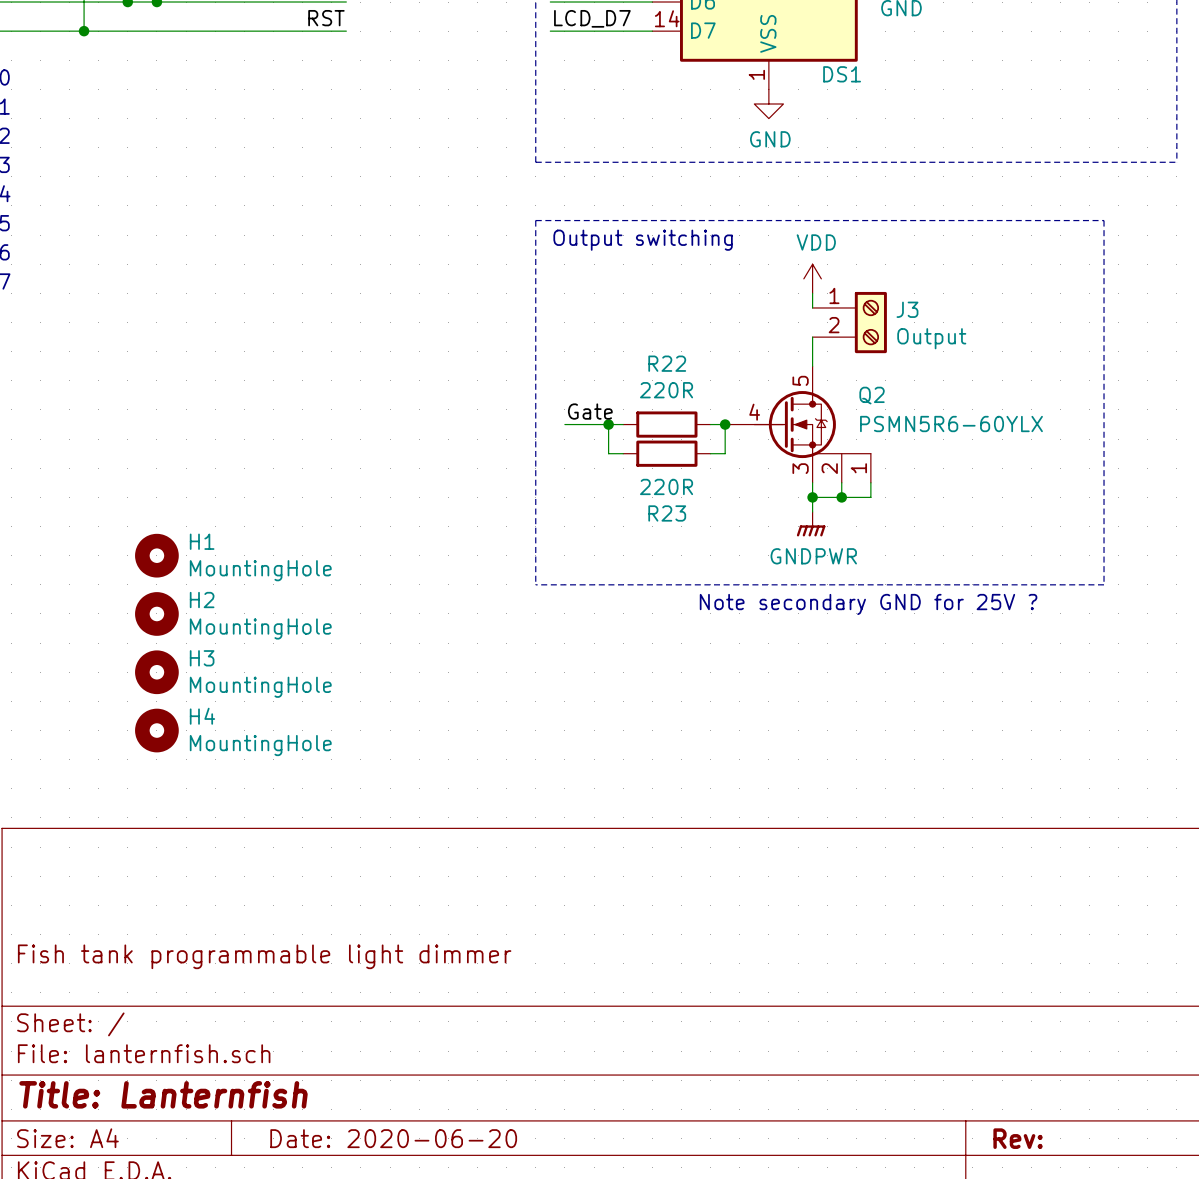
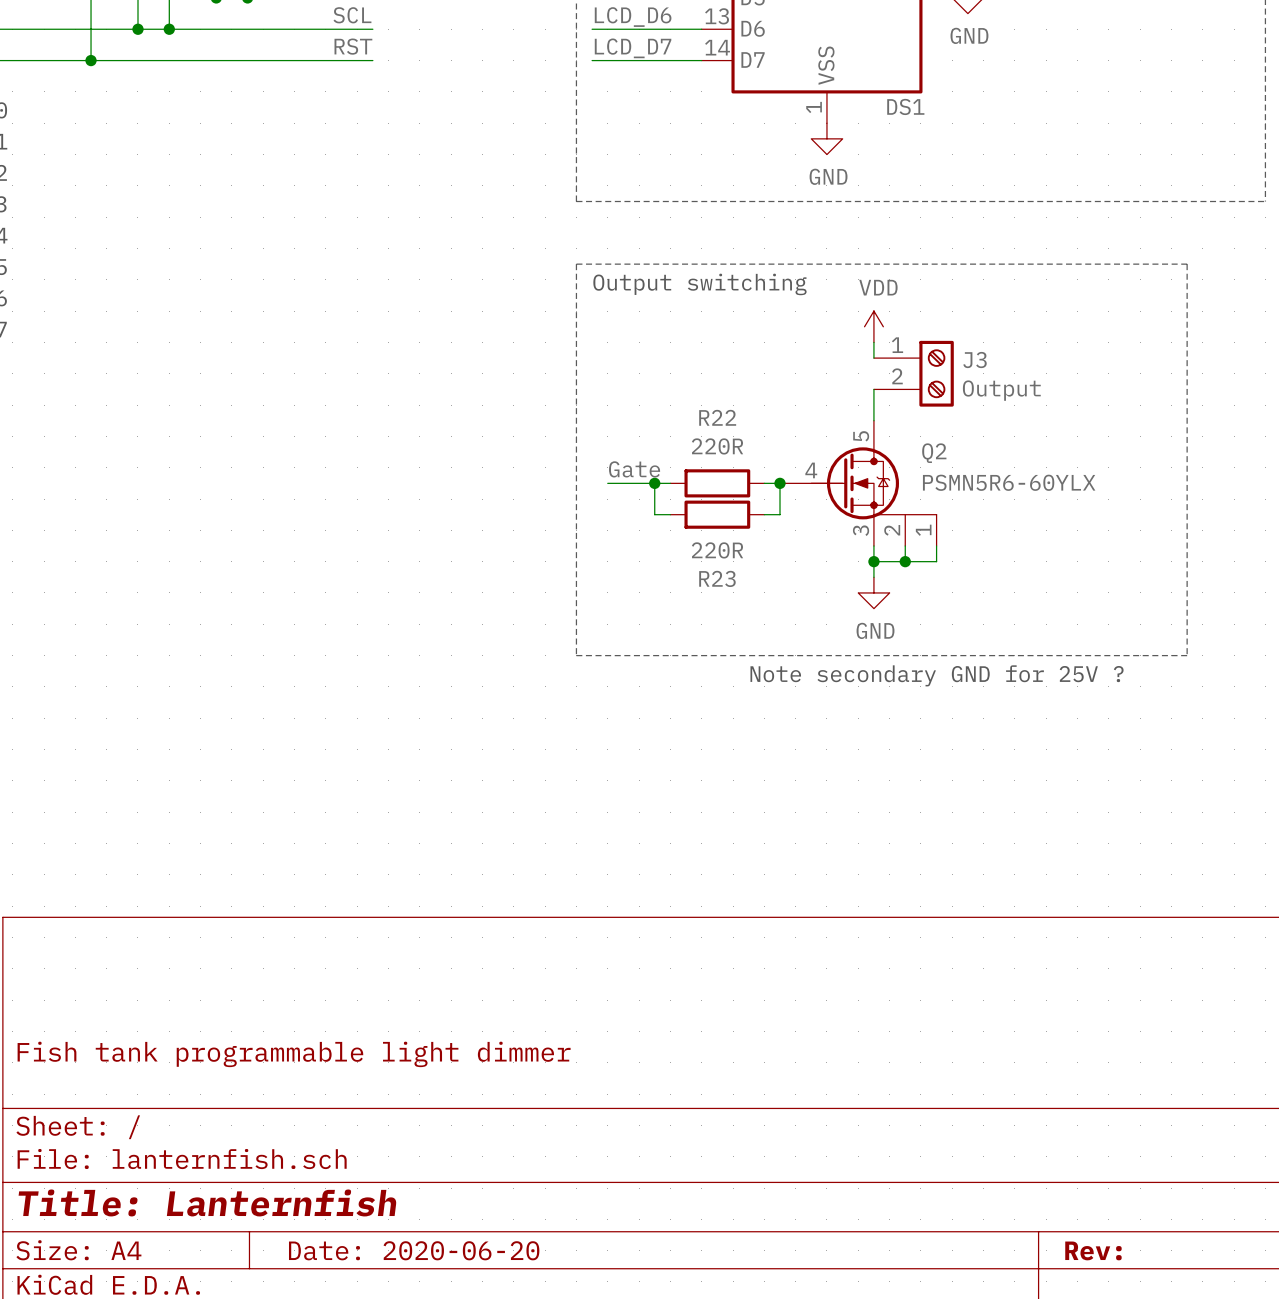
power symbol: GNDPWR (811, 524) -> GND (873, 592)
H1: MountingHole (156, 555) -> none
H2: MountingHole (156, 613) -> none
H3: MountingHole (156, 672) -> none
H4: MountingHole (156, 730) -> none

